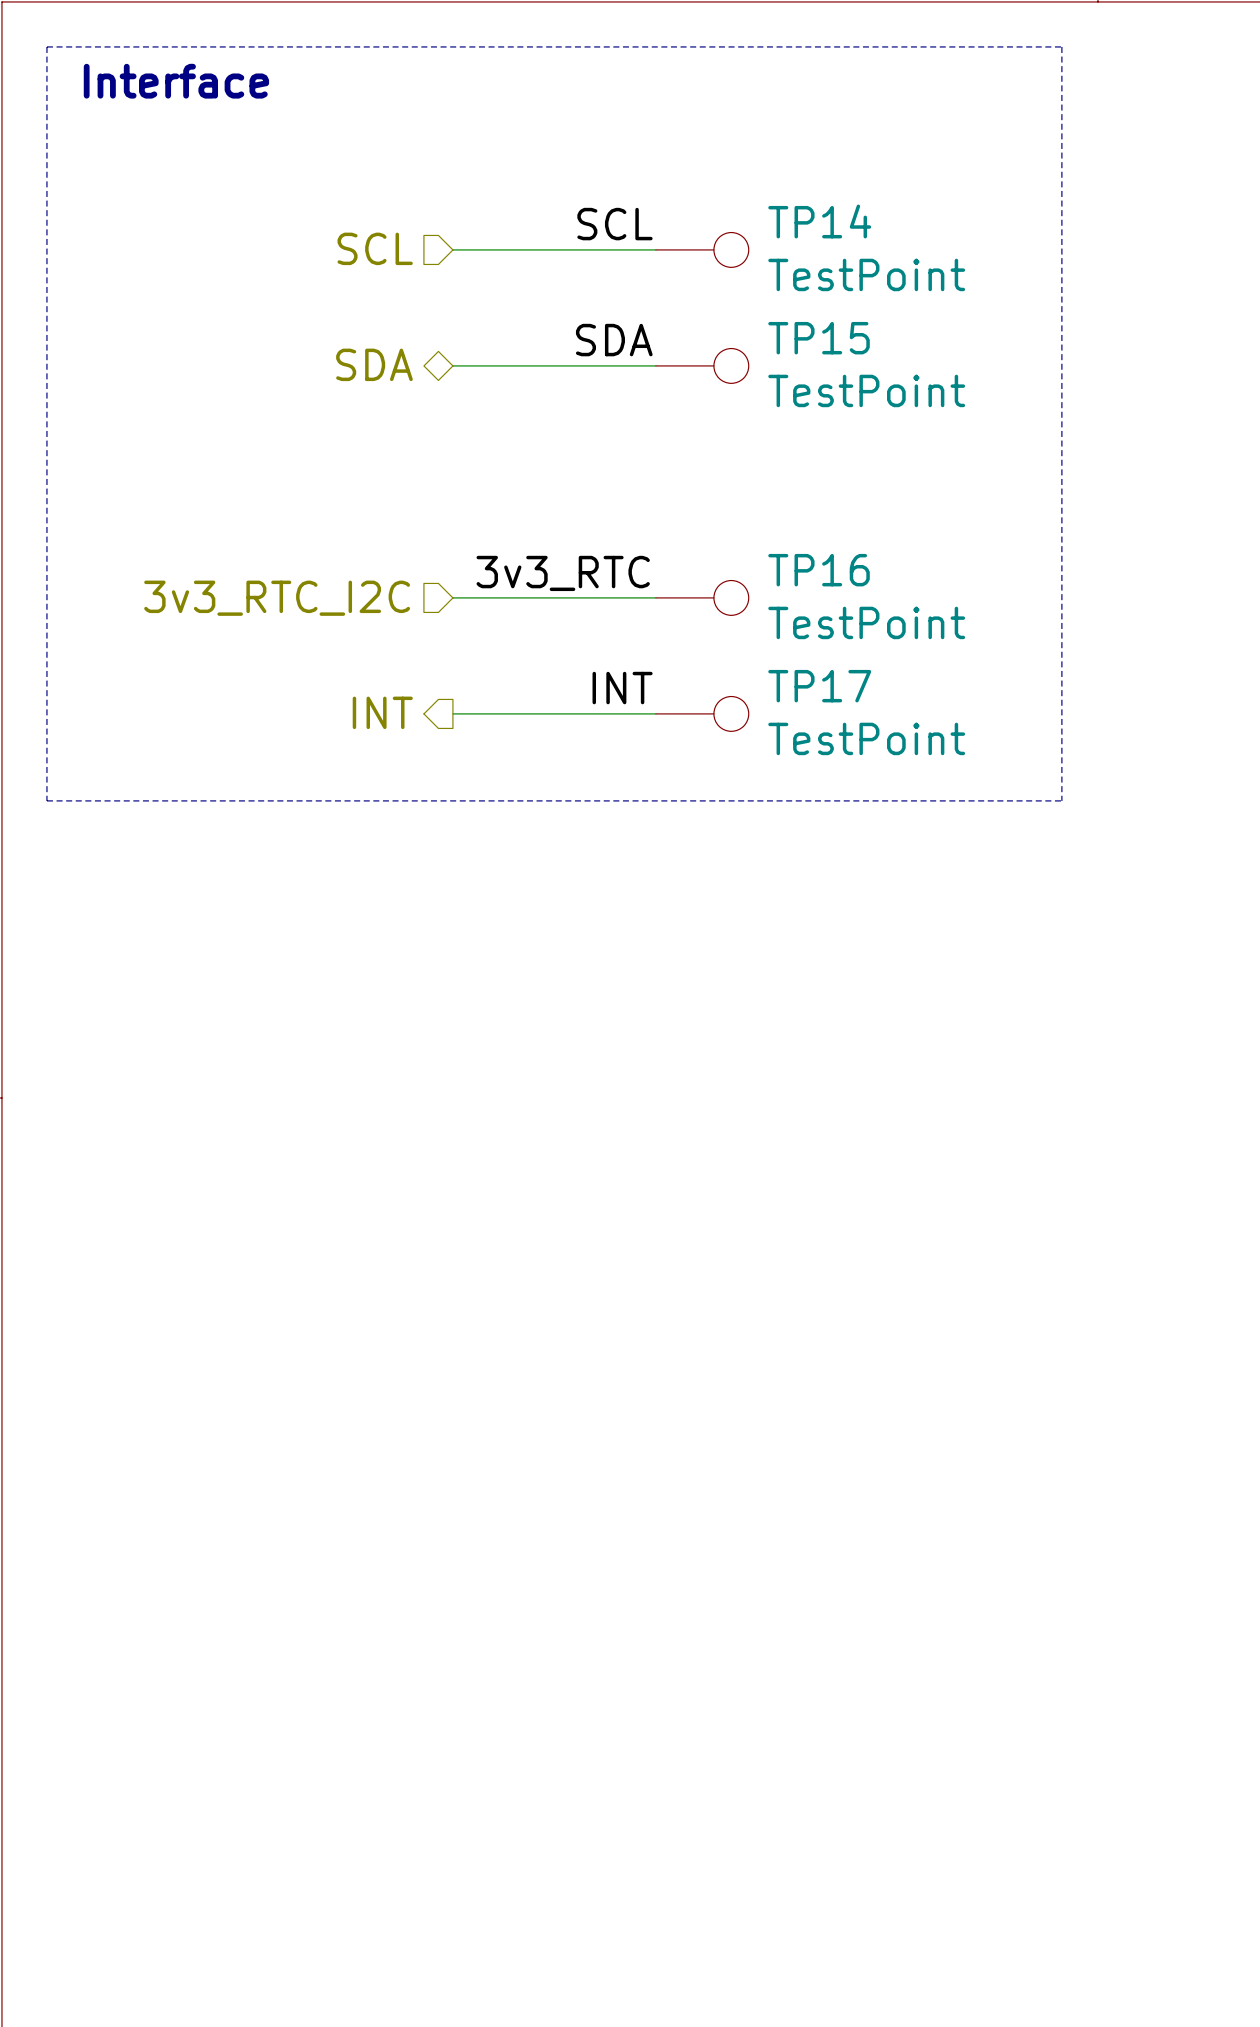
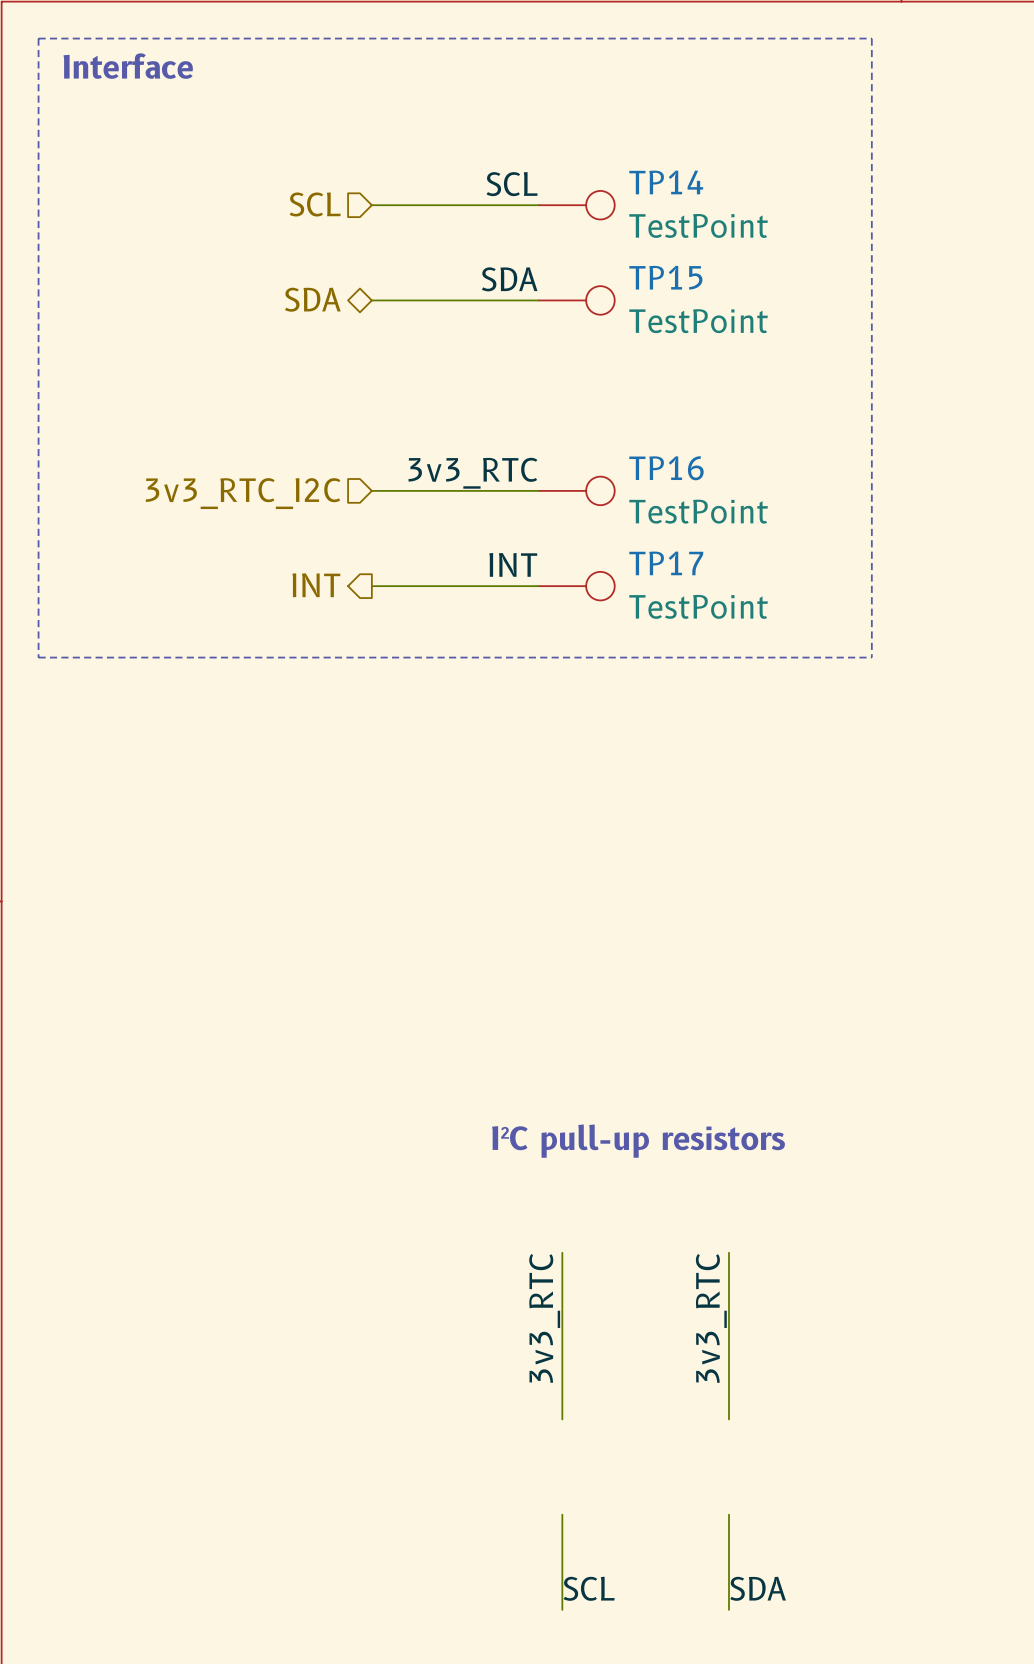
text: none -> I²C pull-up resistors (638, 1141)
wire: none -> (562, 1252) (562, 1419)
wire: none -> (728, 1252) (728, 1419)
label: none -> 3v3_RTC (544, 1318)
label: none -> 3v3_RTC (711, 1318)
wire: none -> (562, 1514) (562, 1609)
wire: none -> (728, 1514) (728, 1609)
label: none -> SCL (589, 1588)
label: none -> SDA (758, 1588)

